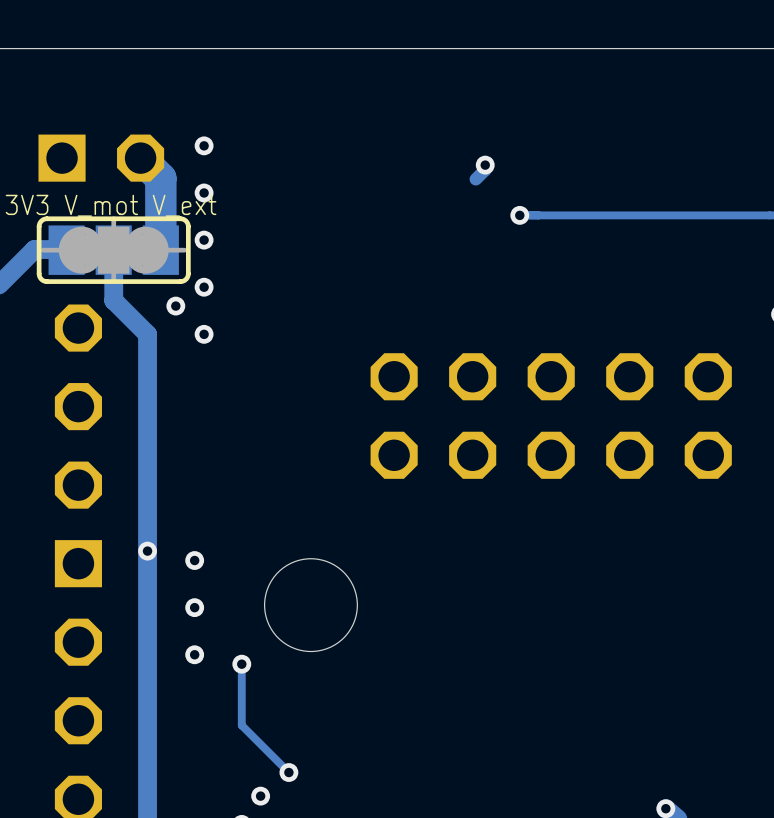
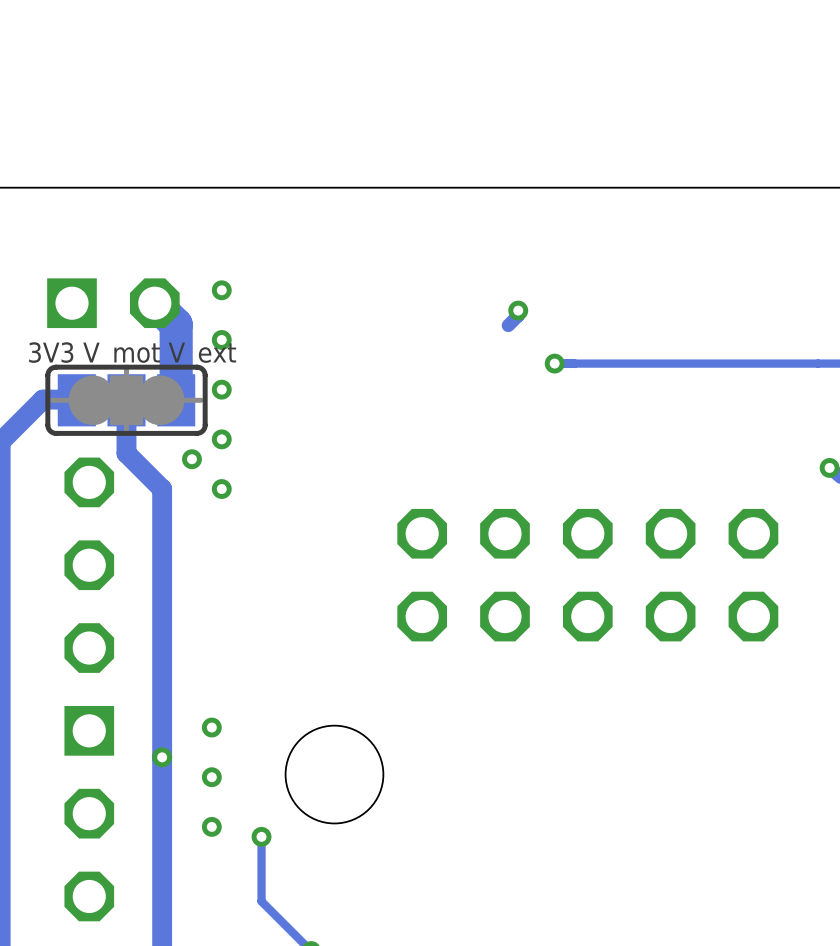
via position: (147, 551) -> (162, 757)

